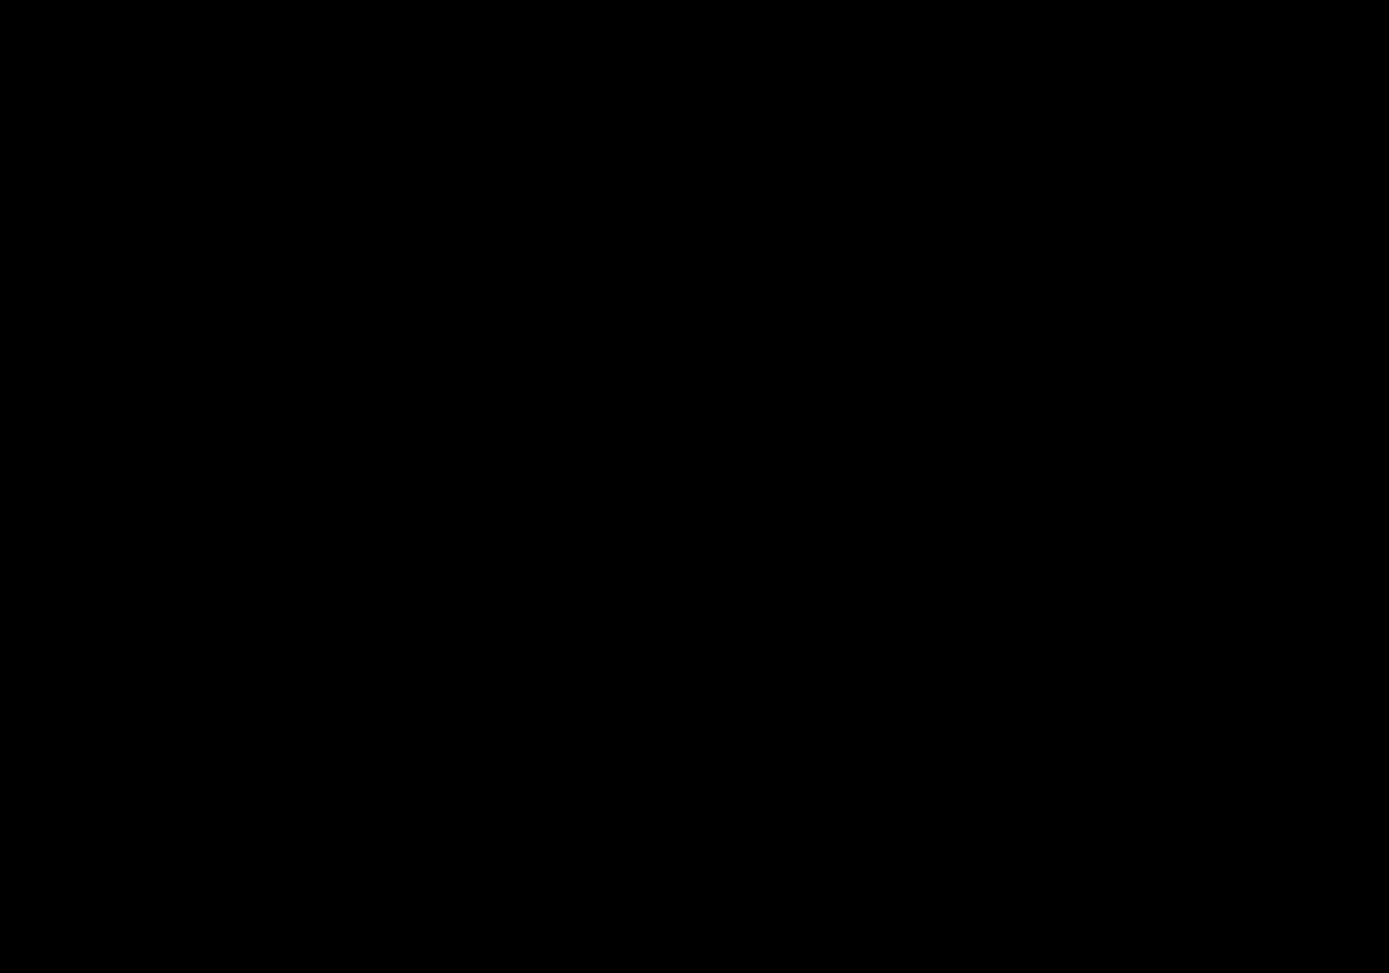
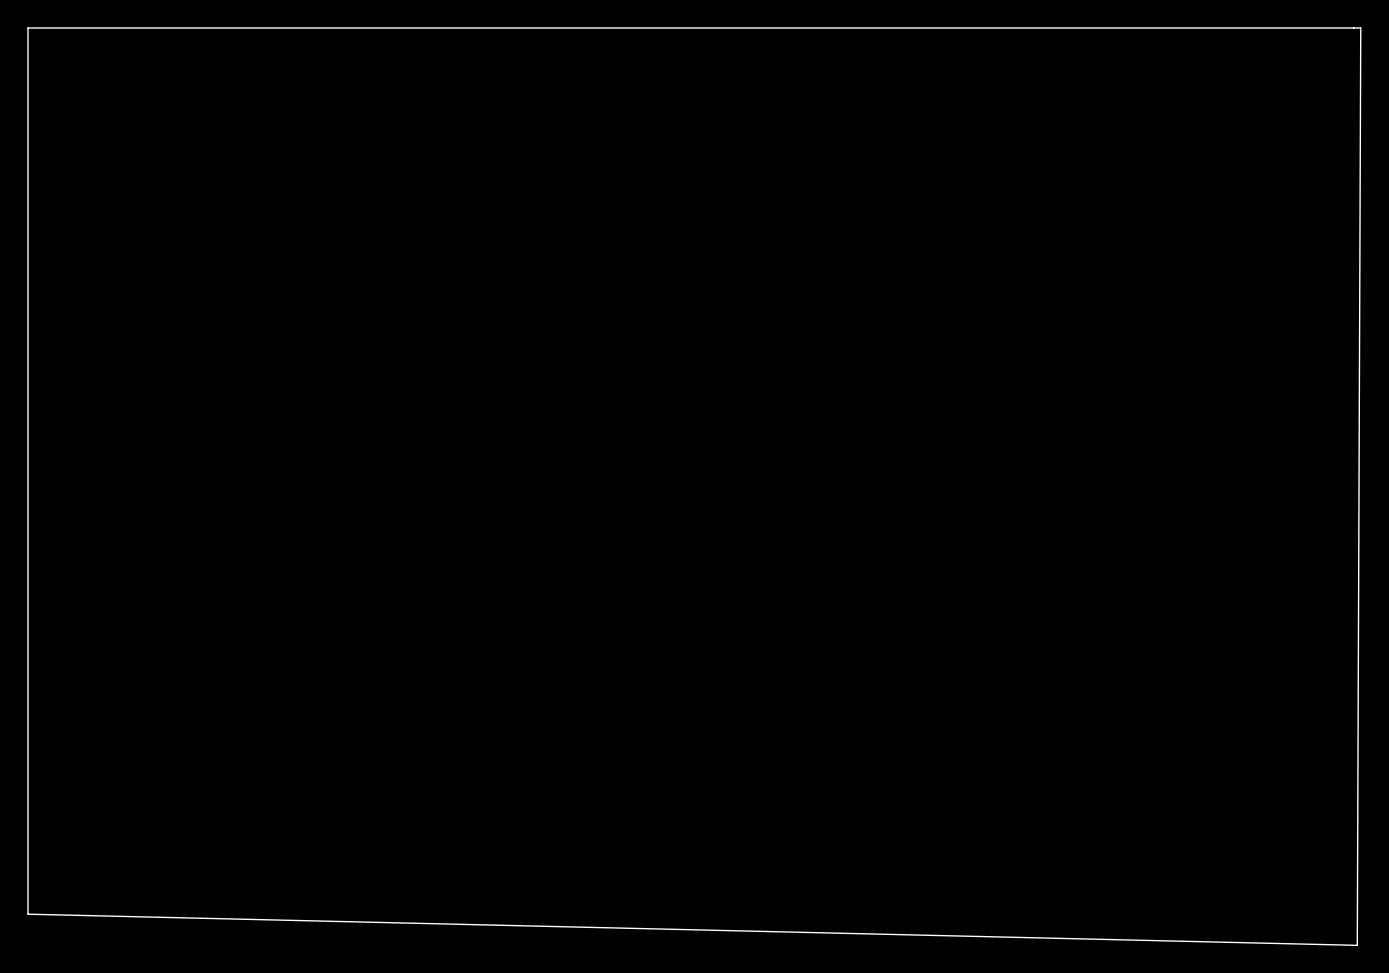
board edge: none -> (28, 28) (1360, 28) (1357, 945) (28, 914) (28, 28)

